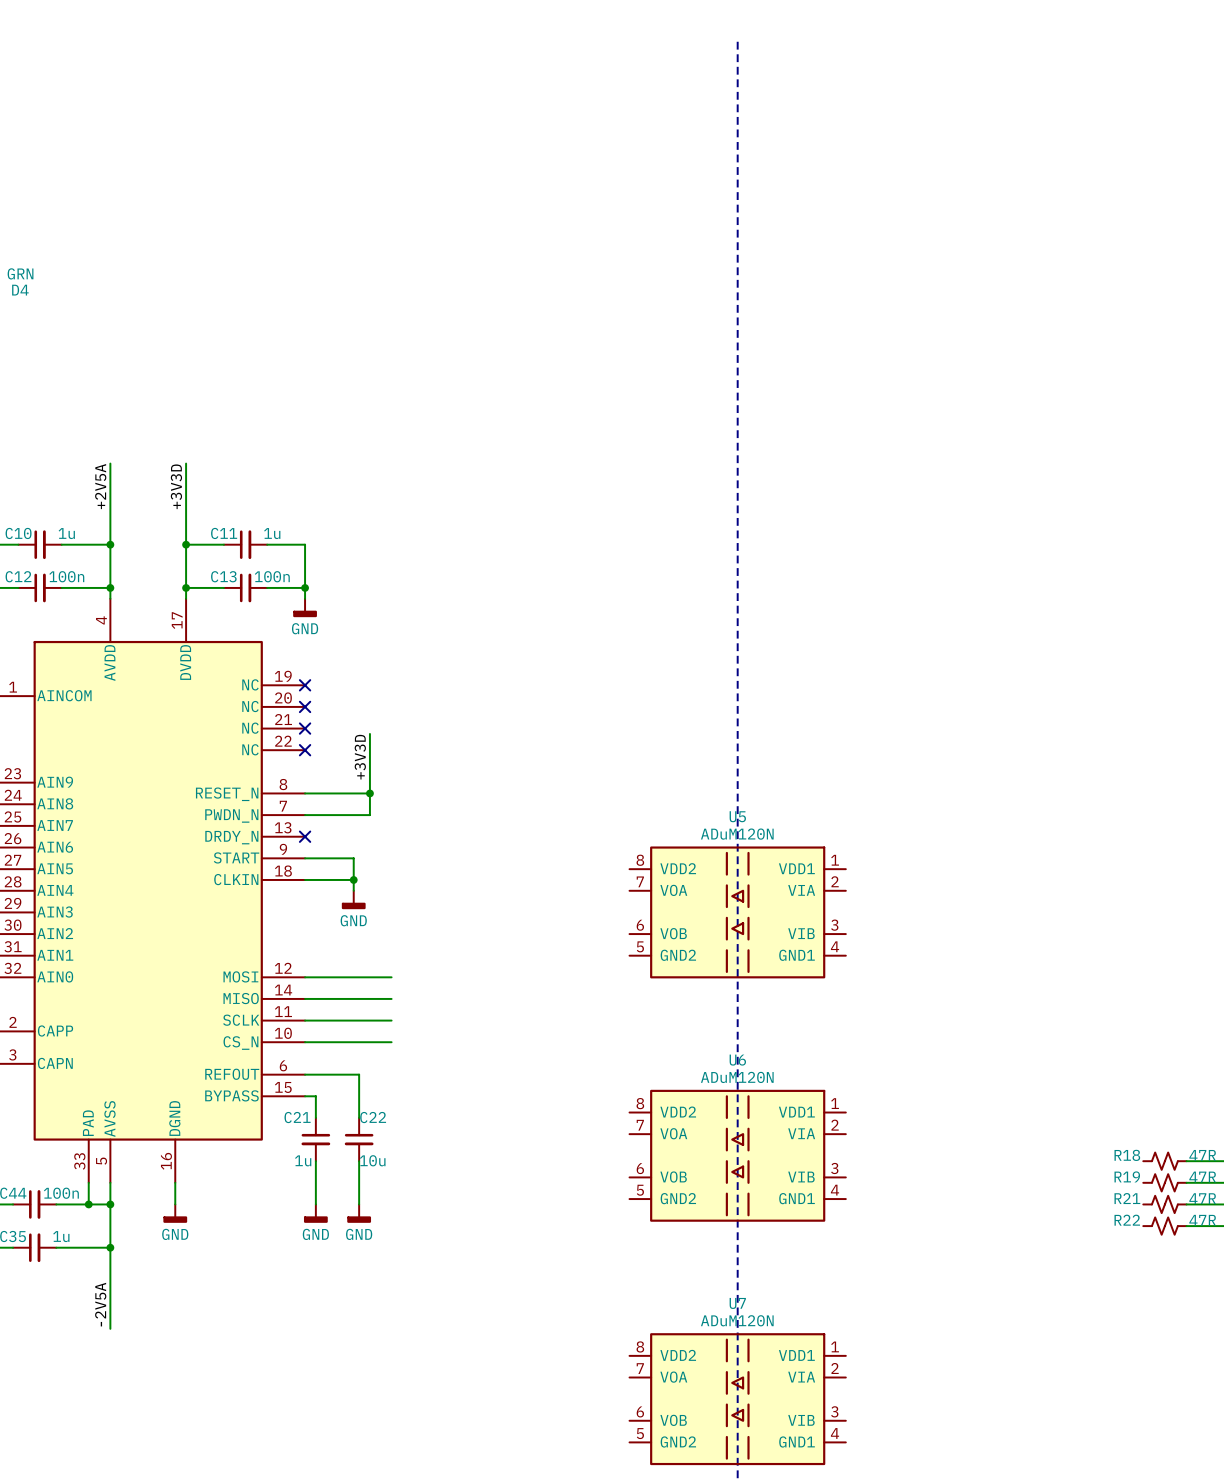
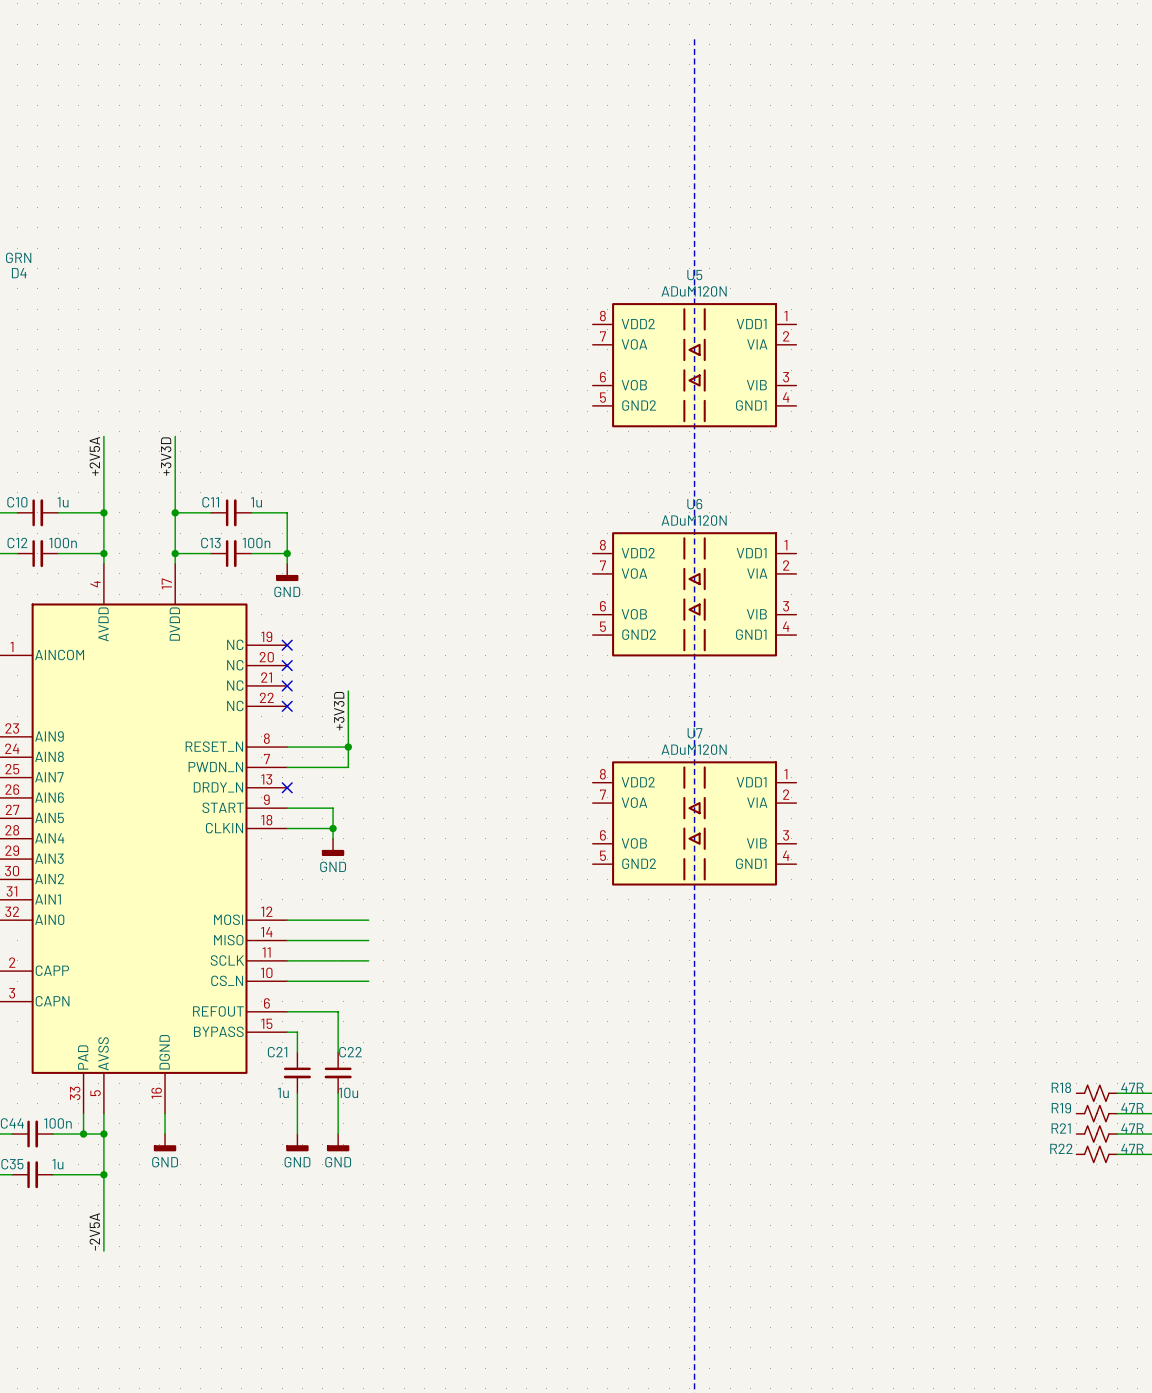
U5 position: (737, 912) -> (694, 365)
U6 position: (737, 1155) -> (694, 594)
U7 position: (737, 1399) -> (694, 823)

